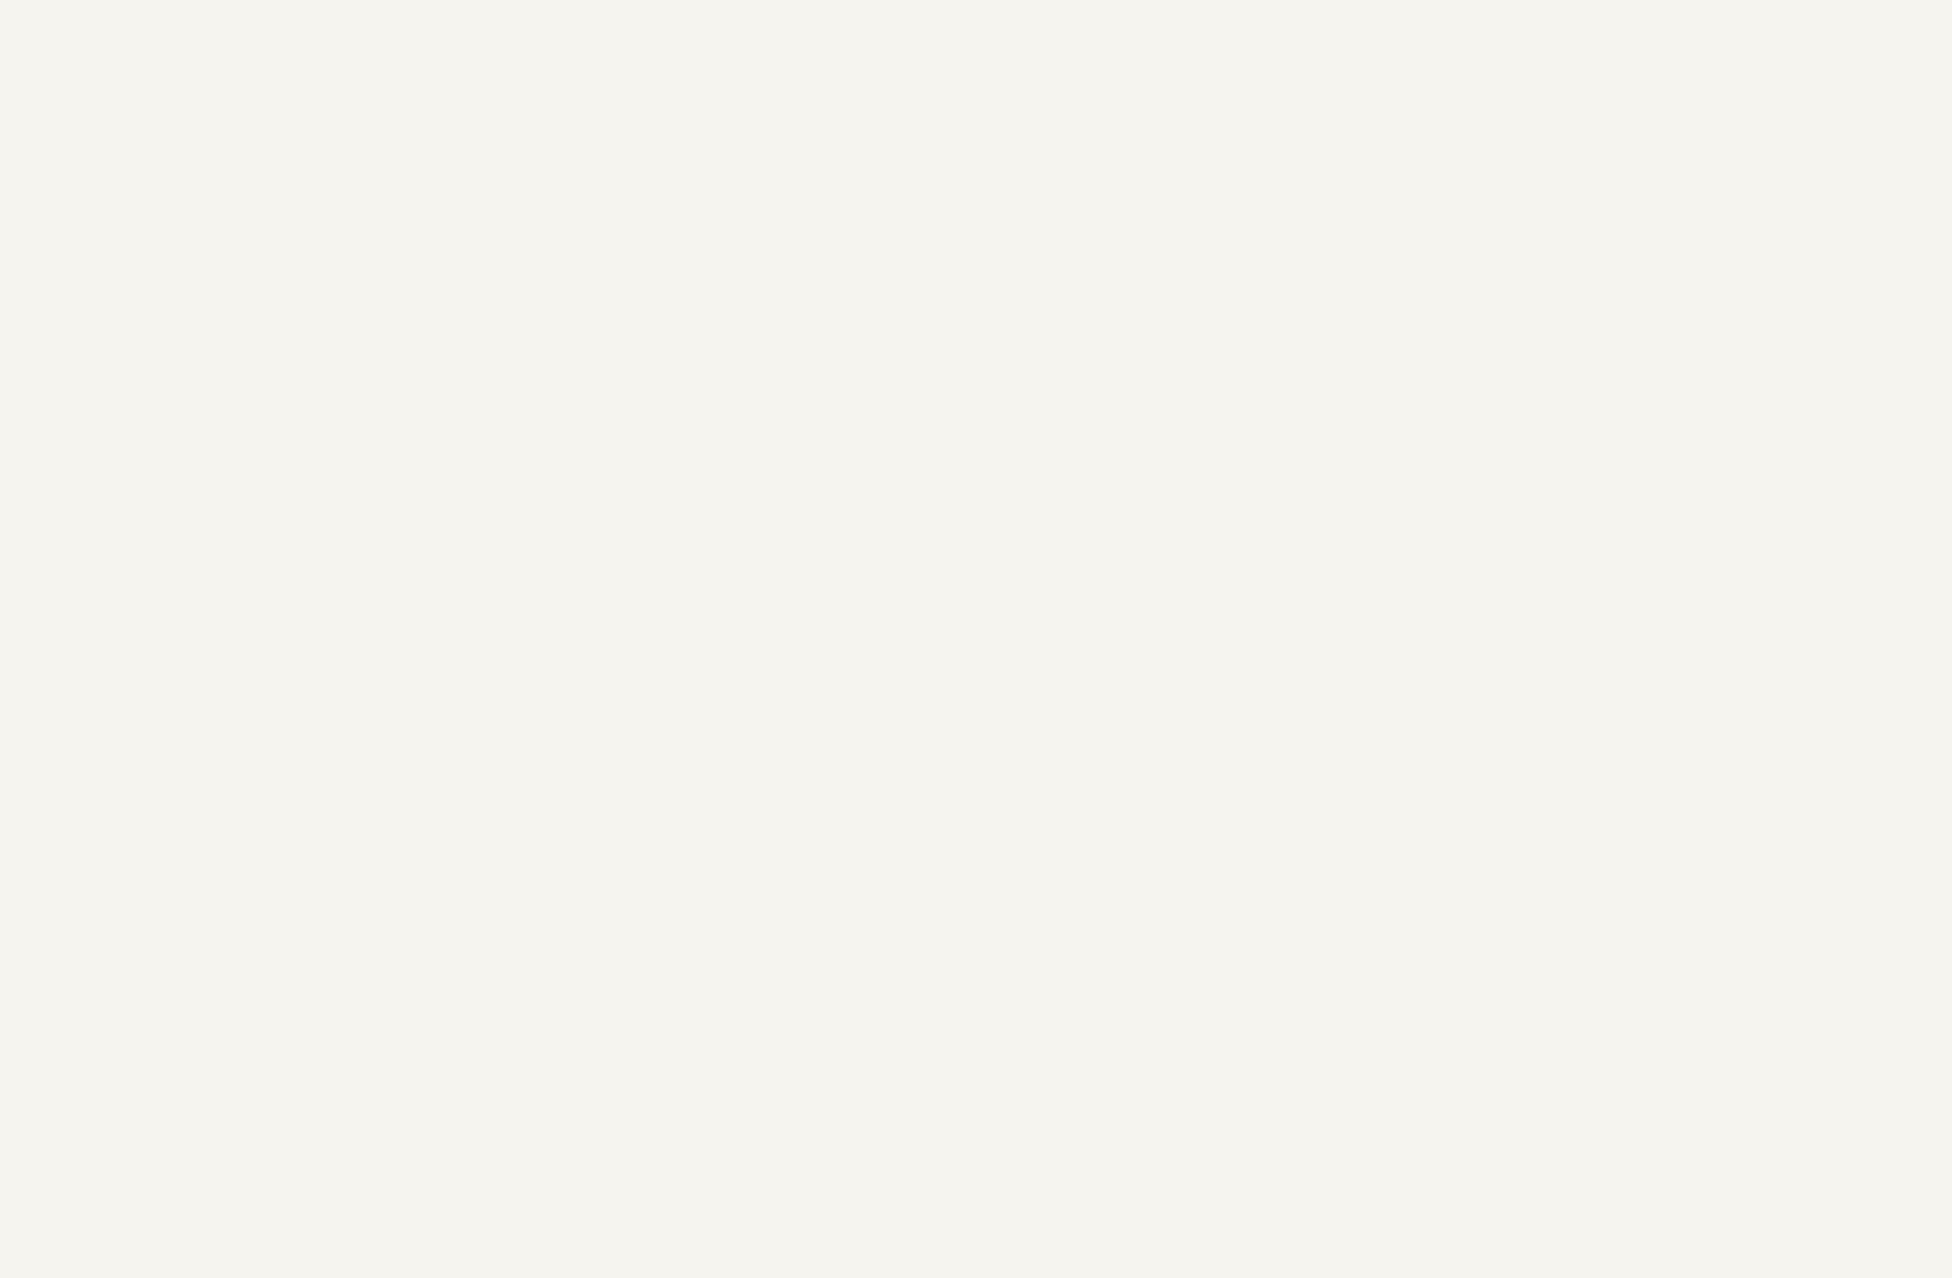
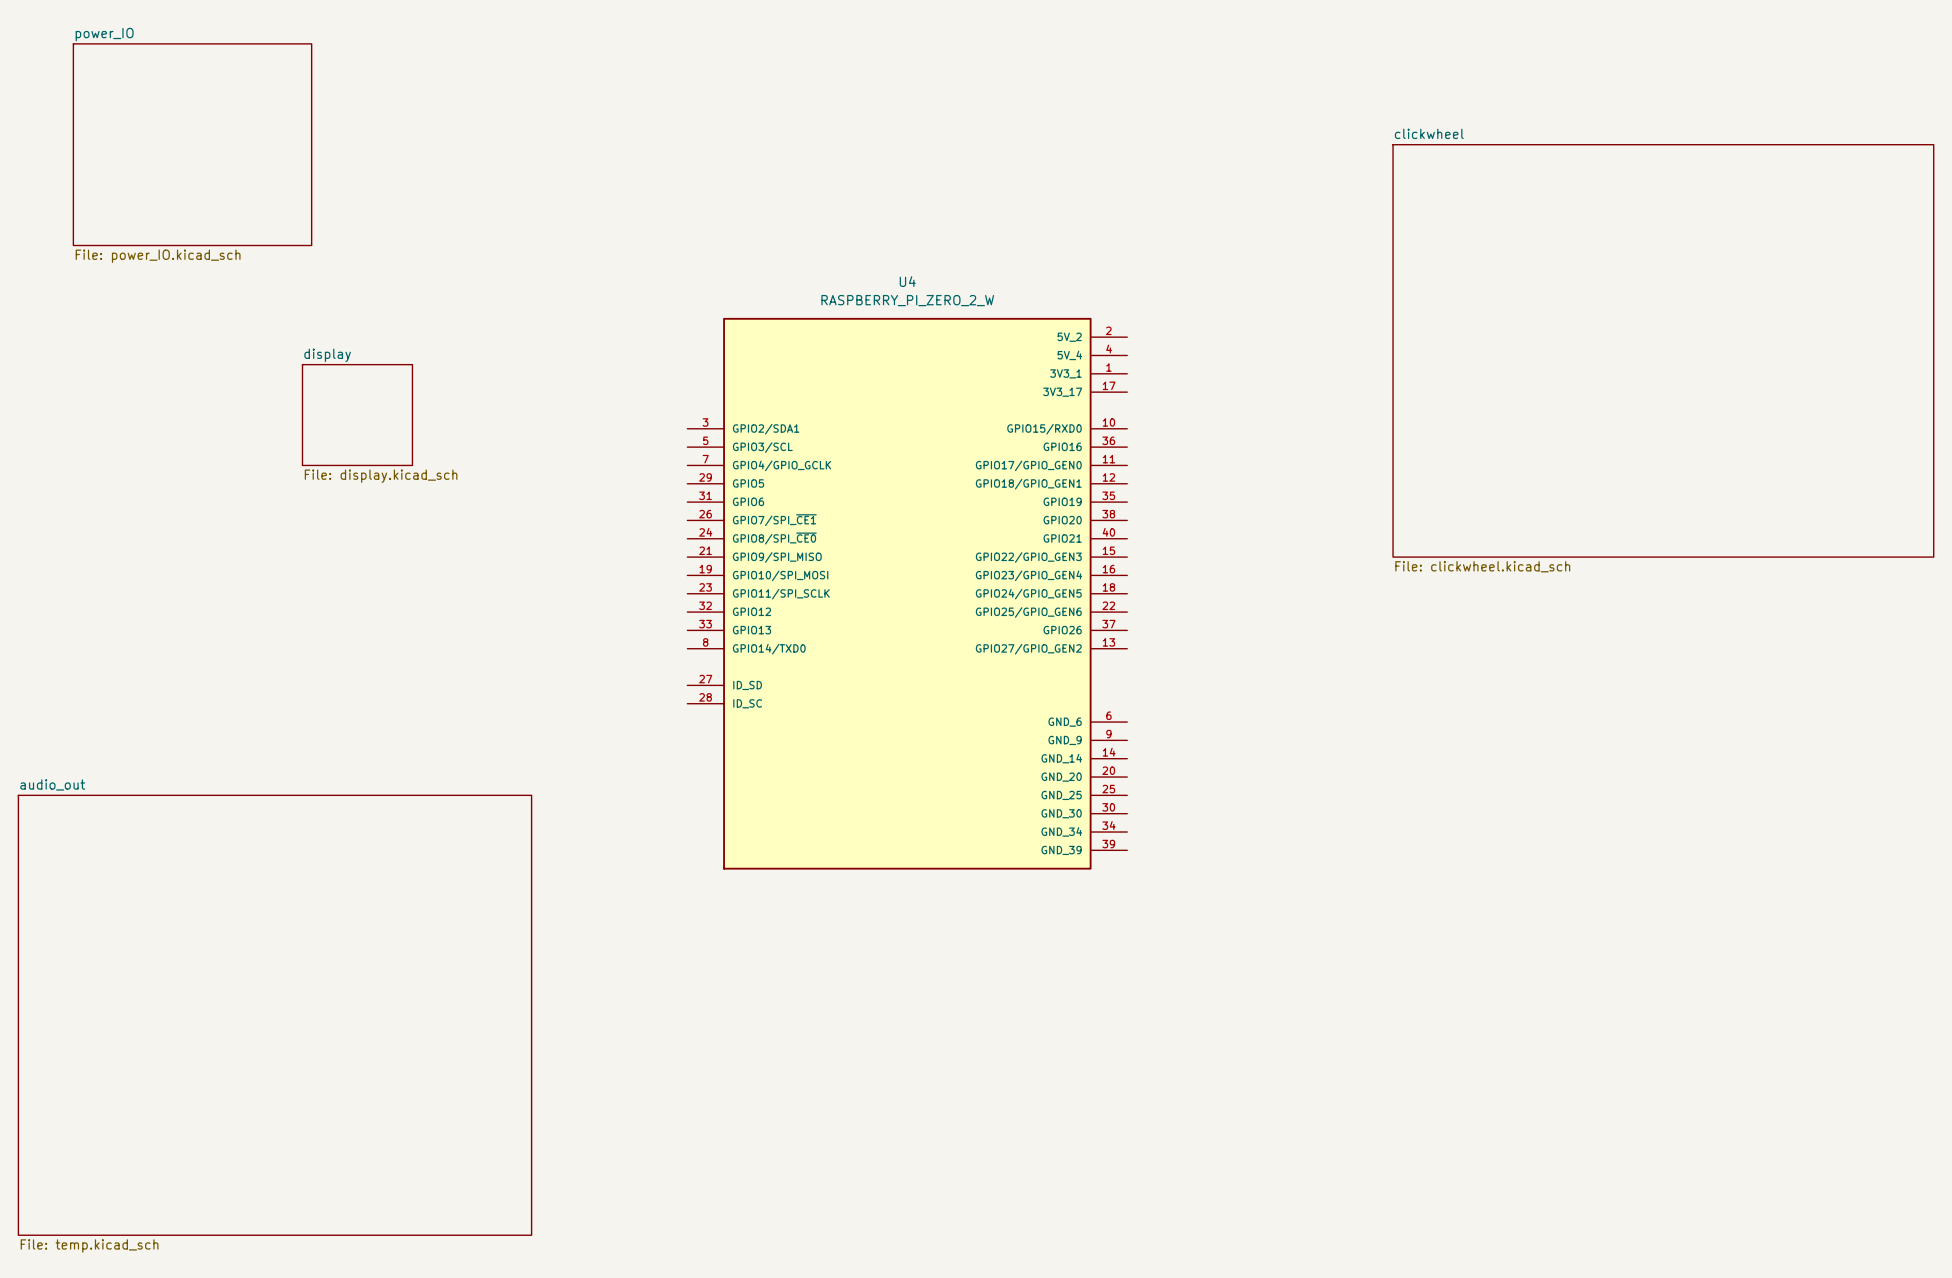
sheet power_IO: none -> File: power_IO.kicad_sch (192, 144)
sheet clickwheel: none -> File: clickwheel.kicad_sch (1663, 350)
sheet display: none -> File: display.kicad_sch (357, 415)
U4: none -> RASPBERRY_PI_ZERO_2_W (907, 593)
sheet audio_out: none -> File: temp.kicad_sch (274, 1015)

